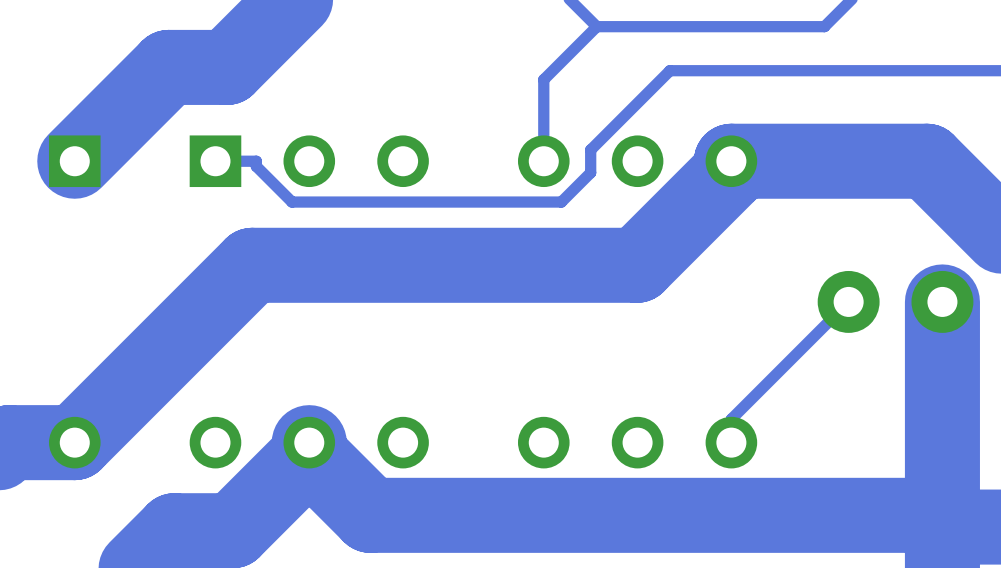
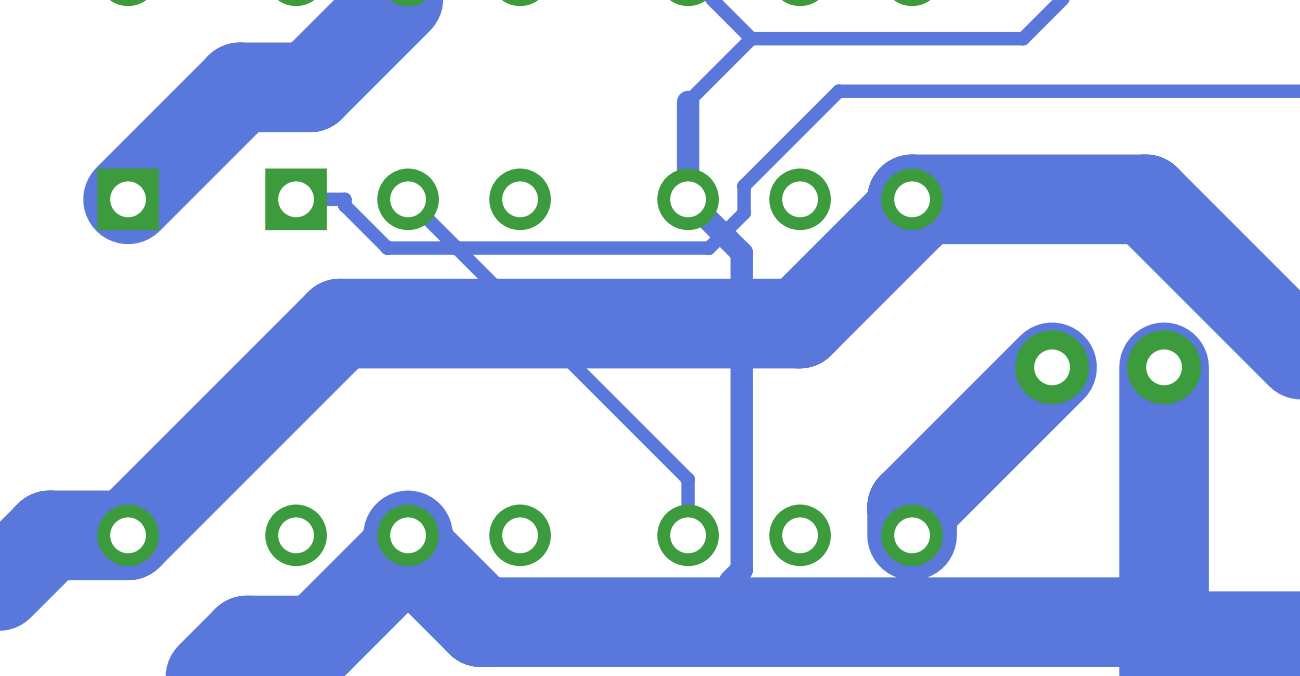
track width: thin (543, 79) (543, 161) -> thick (688, 101) (688, 199)
track: none -> (408, 199) (688, 479) (688, 535)
track: none -> (688, 199) (741, 252) (741, 569) (730, 581)
track width: thin (848, 301) (731, 419) (731, 442) -> thick (1052, 367) (912, 507) (912, 535)

